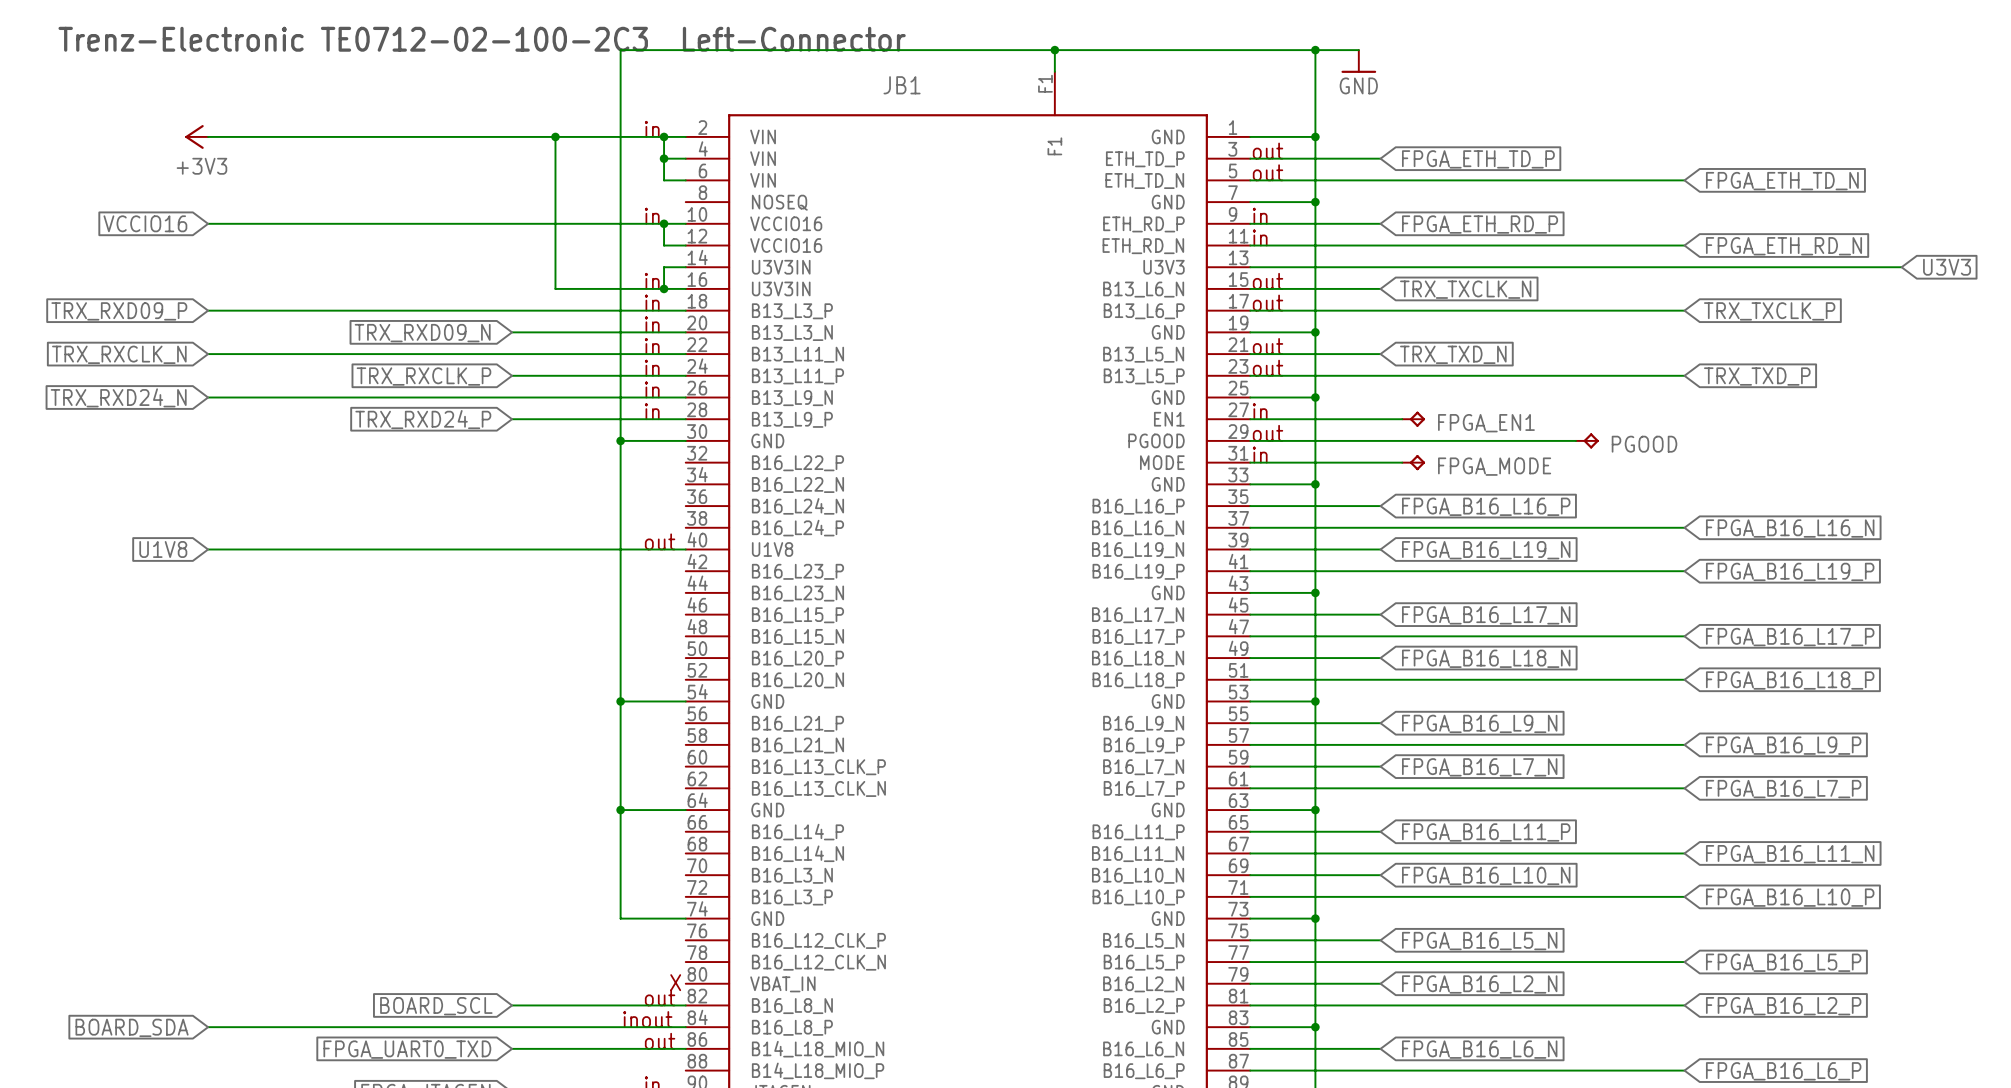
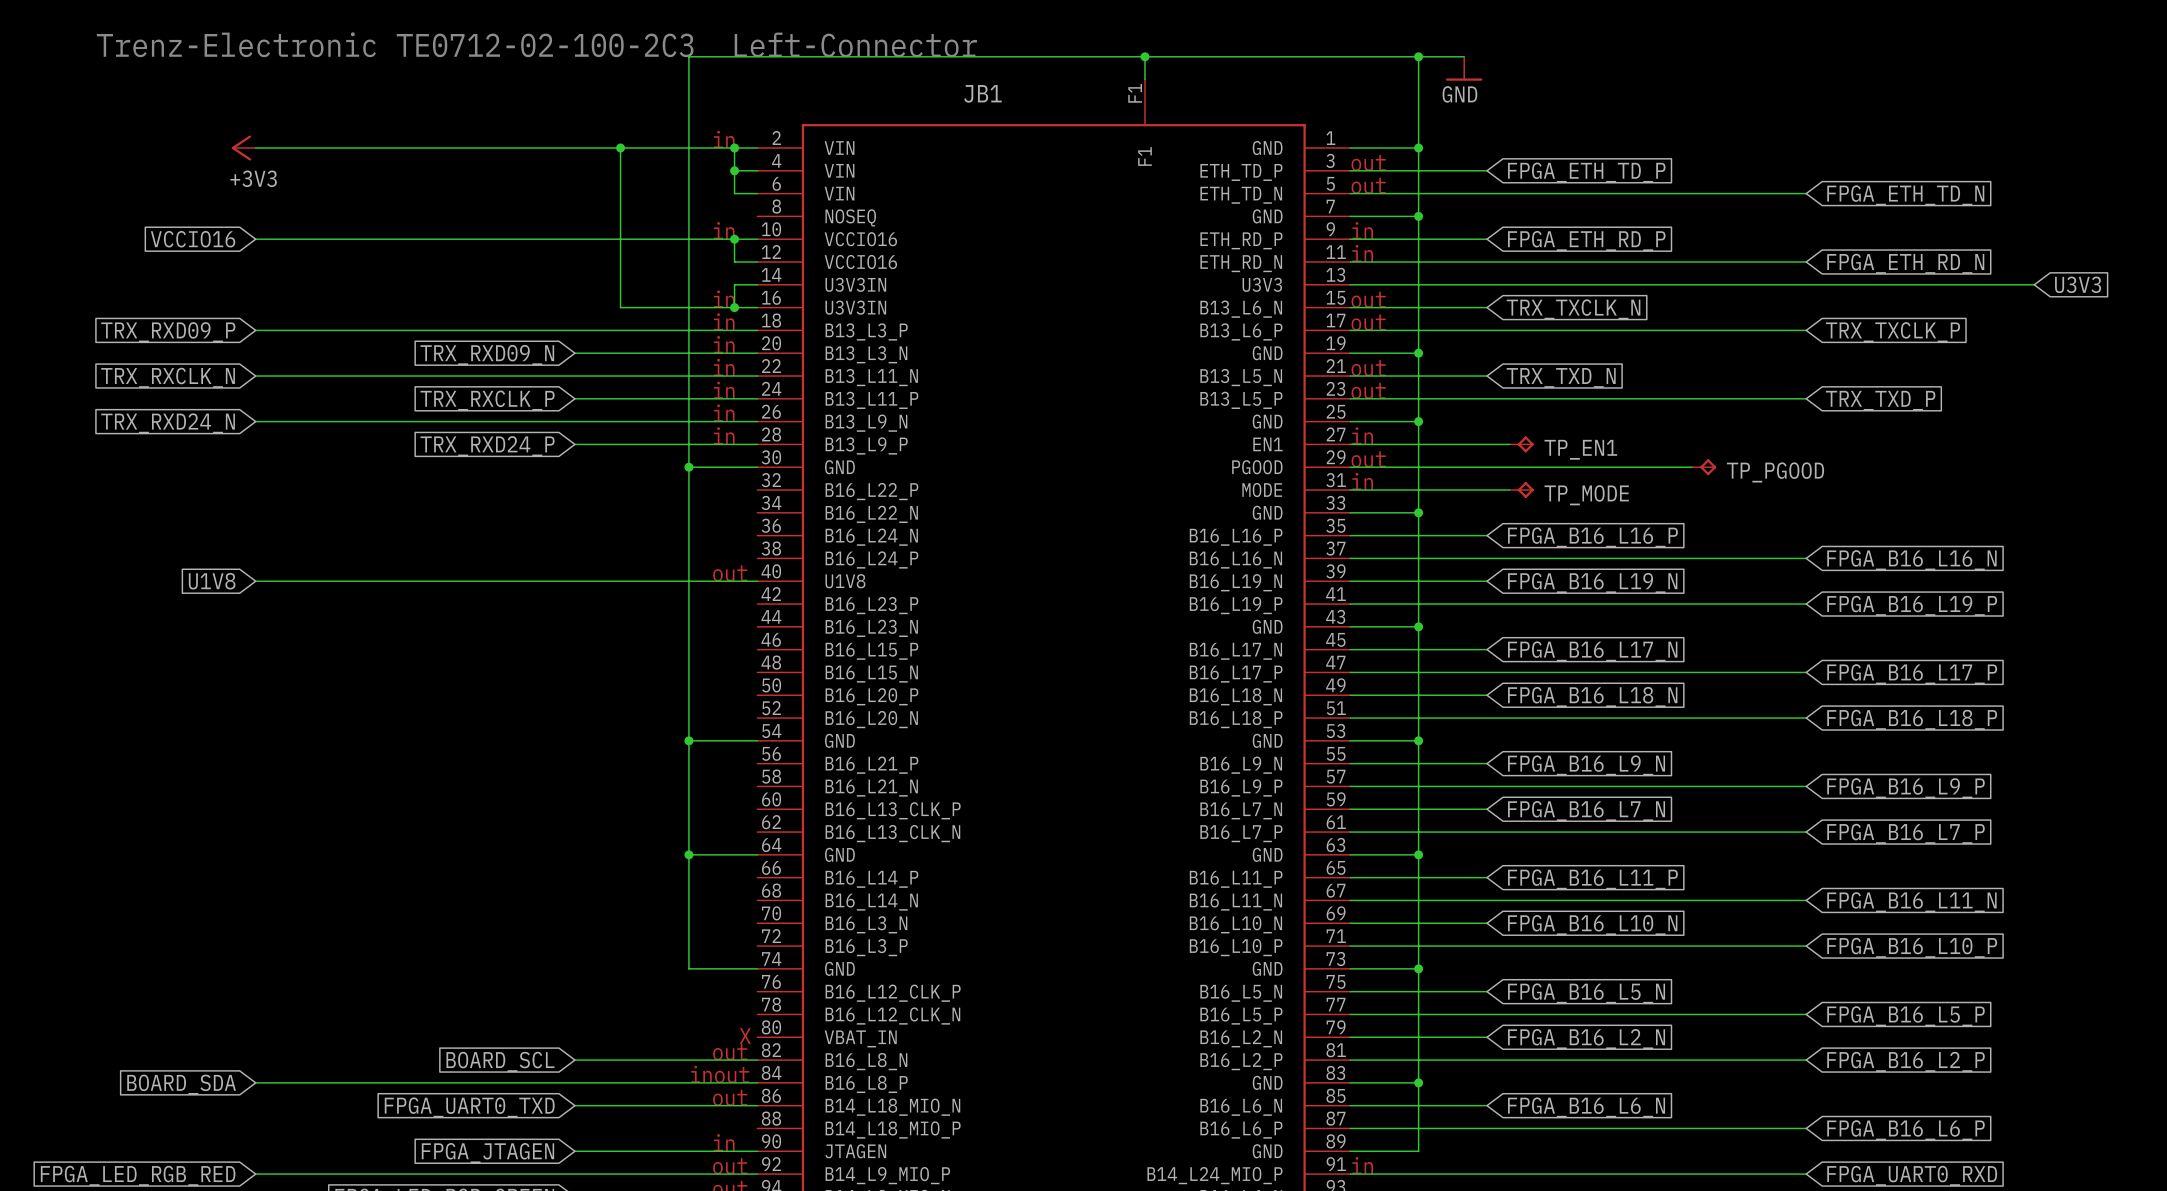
FPGA_EN1 name: FPGA_EN1 (1486, 423) -> TP_EN1 (1580, 449)
PGOOD name: PGOOD (1644, 444) -> TP_PGOOD (1775, 472)
FPGA_MODE name: FPGA_MODE (1494, 466) -> TP_MODE (1586, 495)

